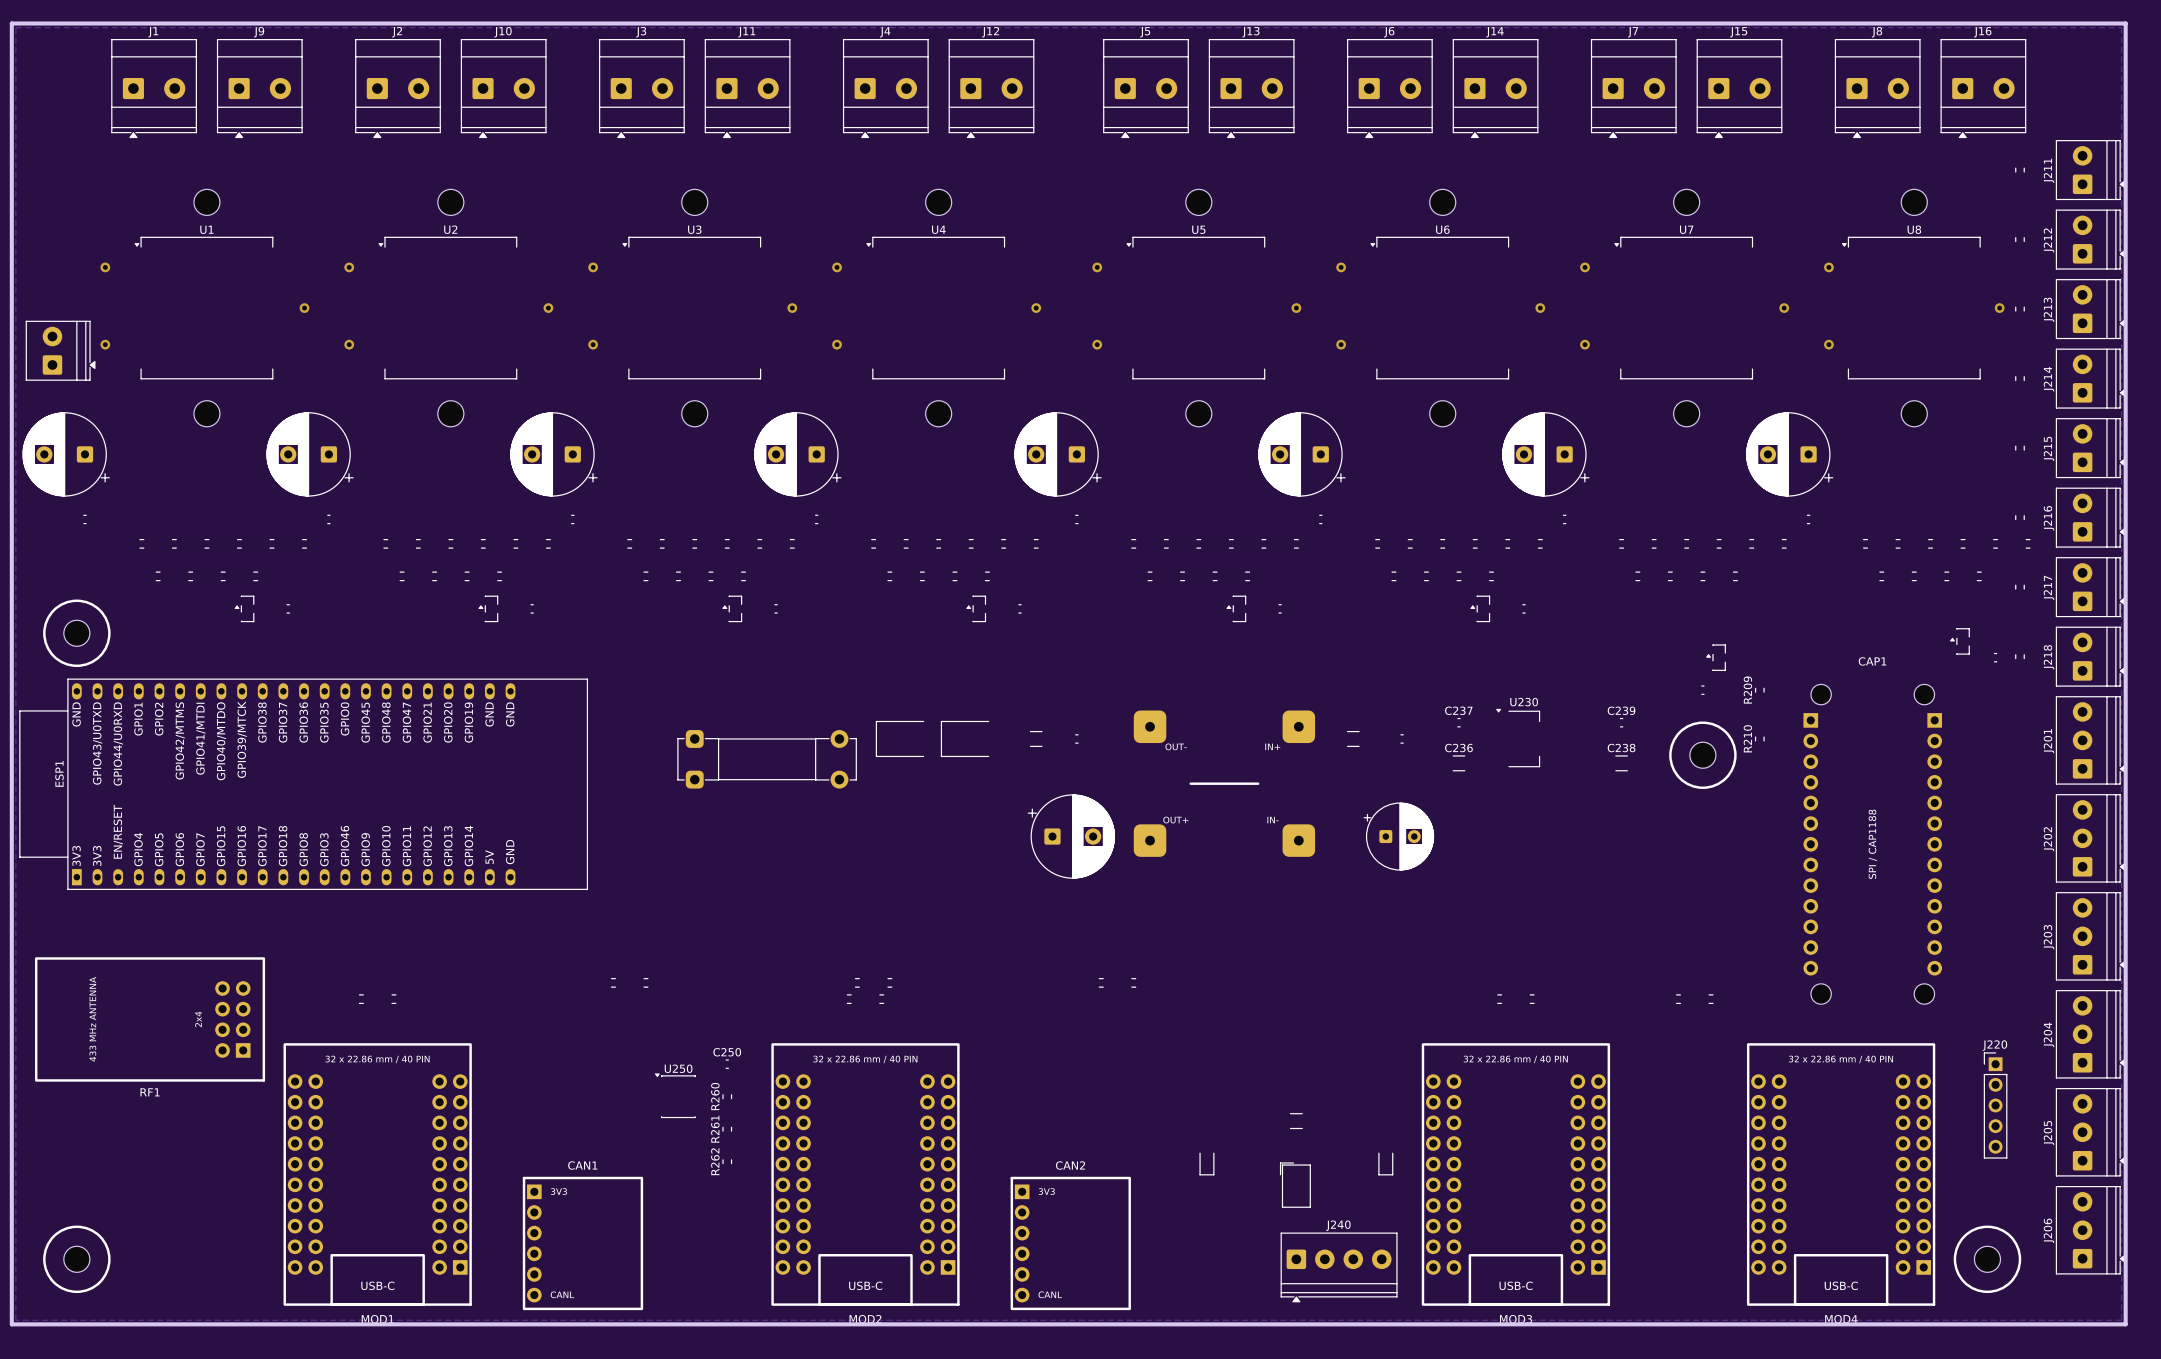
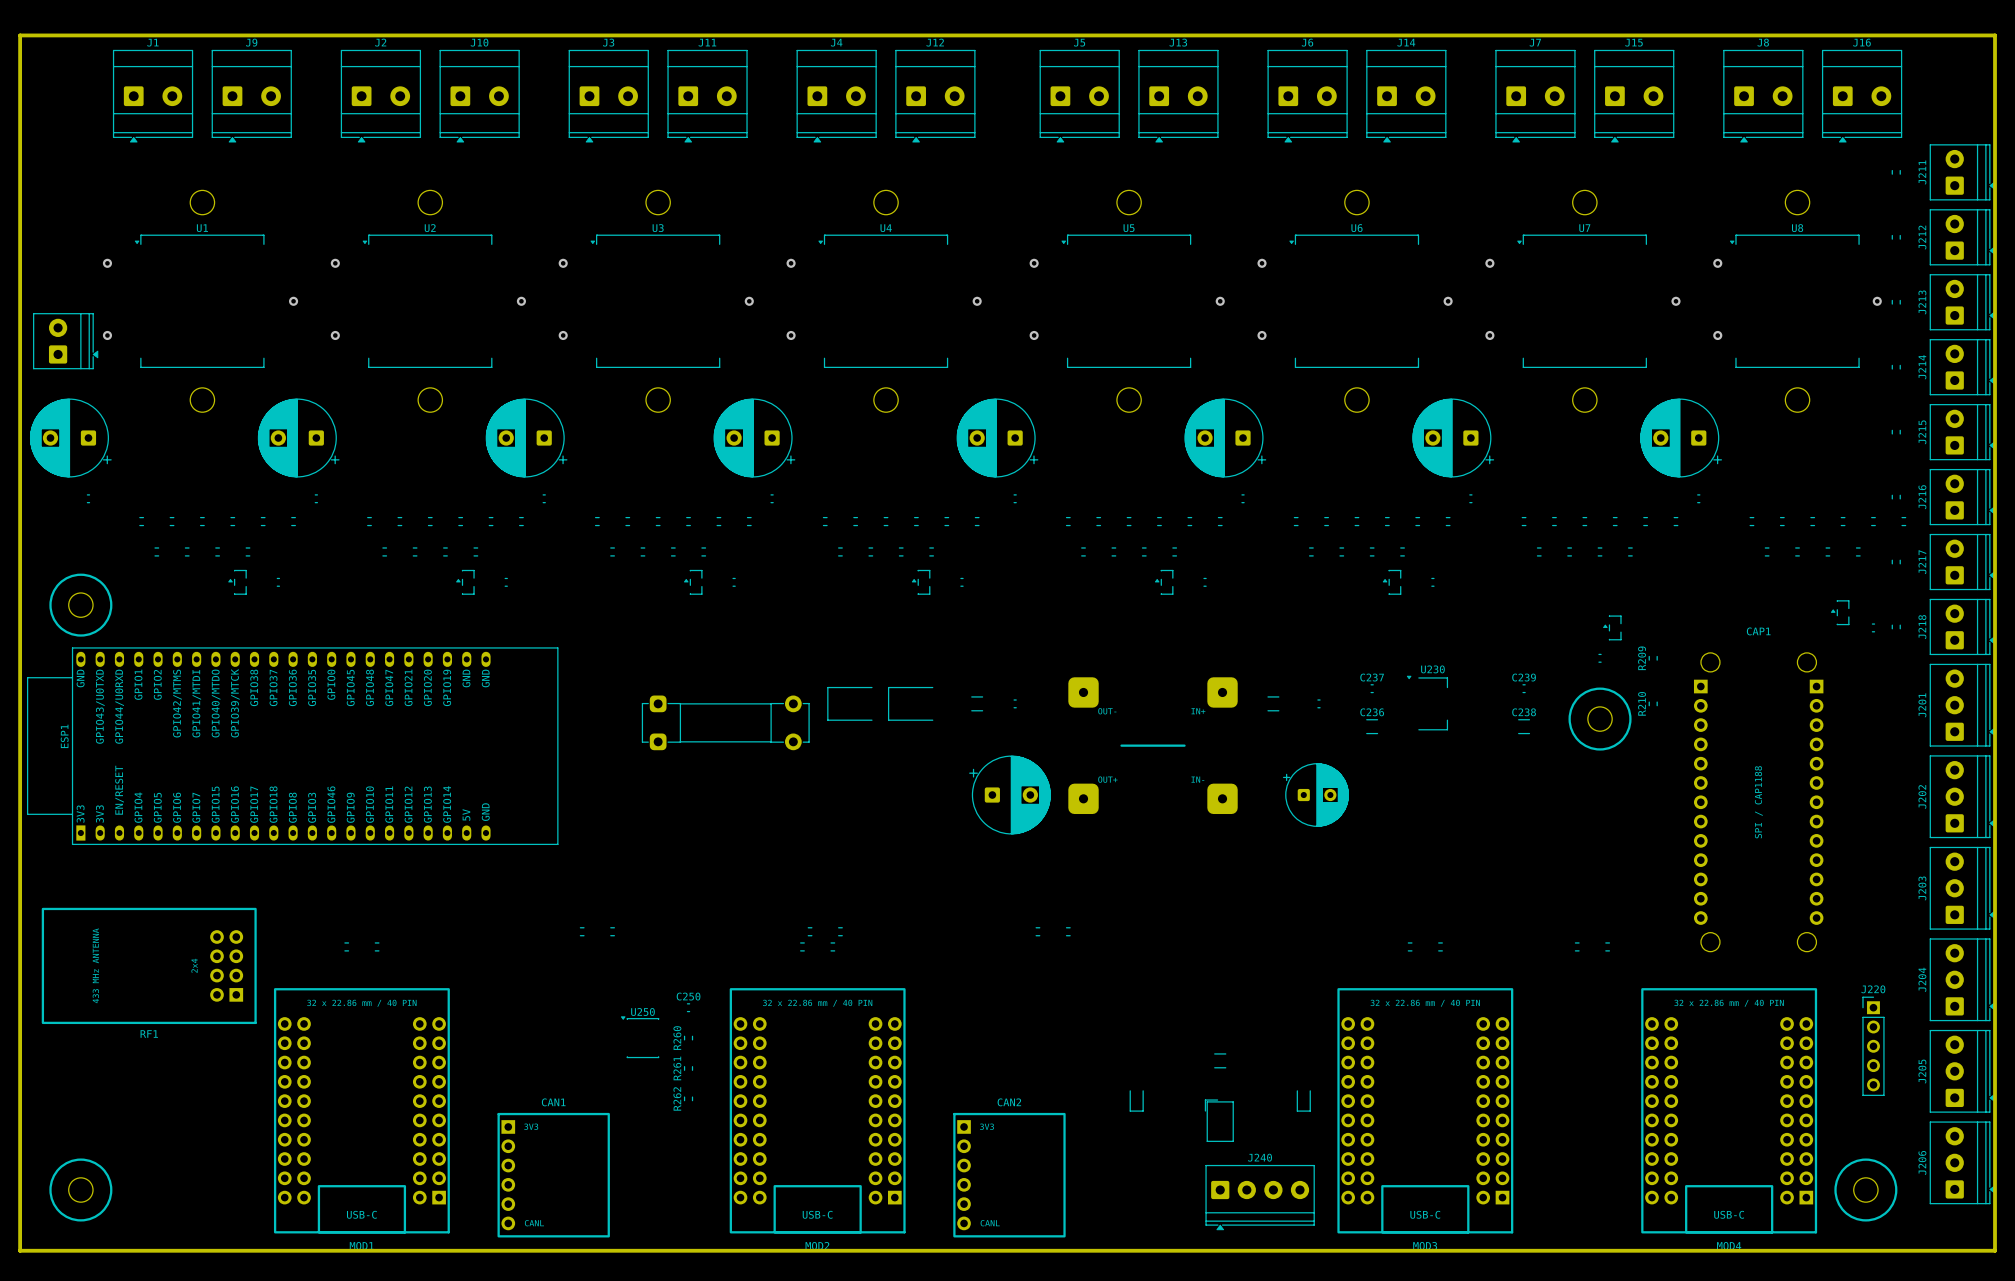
zone outline: (15, 27) (2121, 27) (2121, 1320) (15, 1320) (15, 27) -> none

